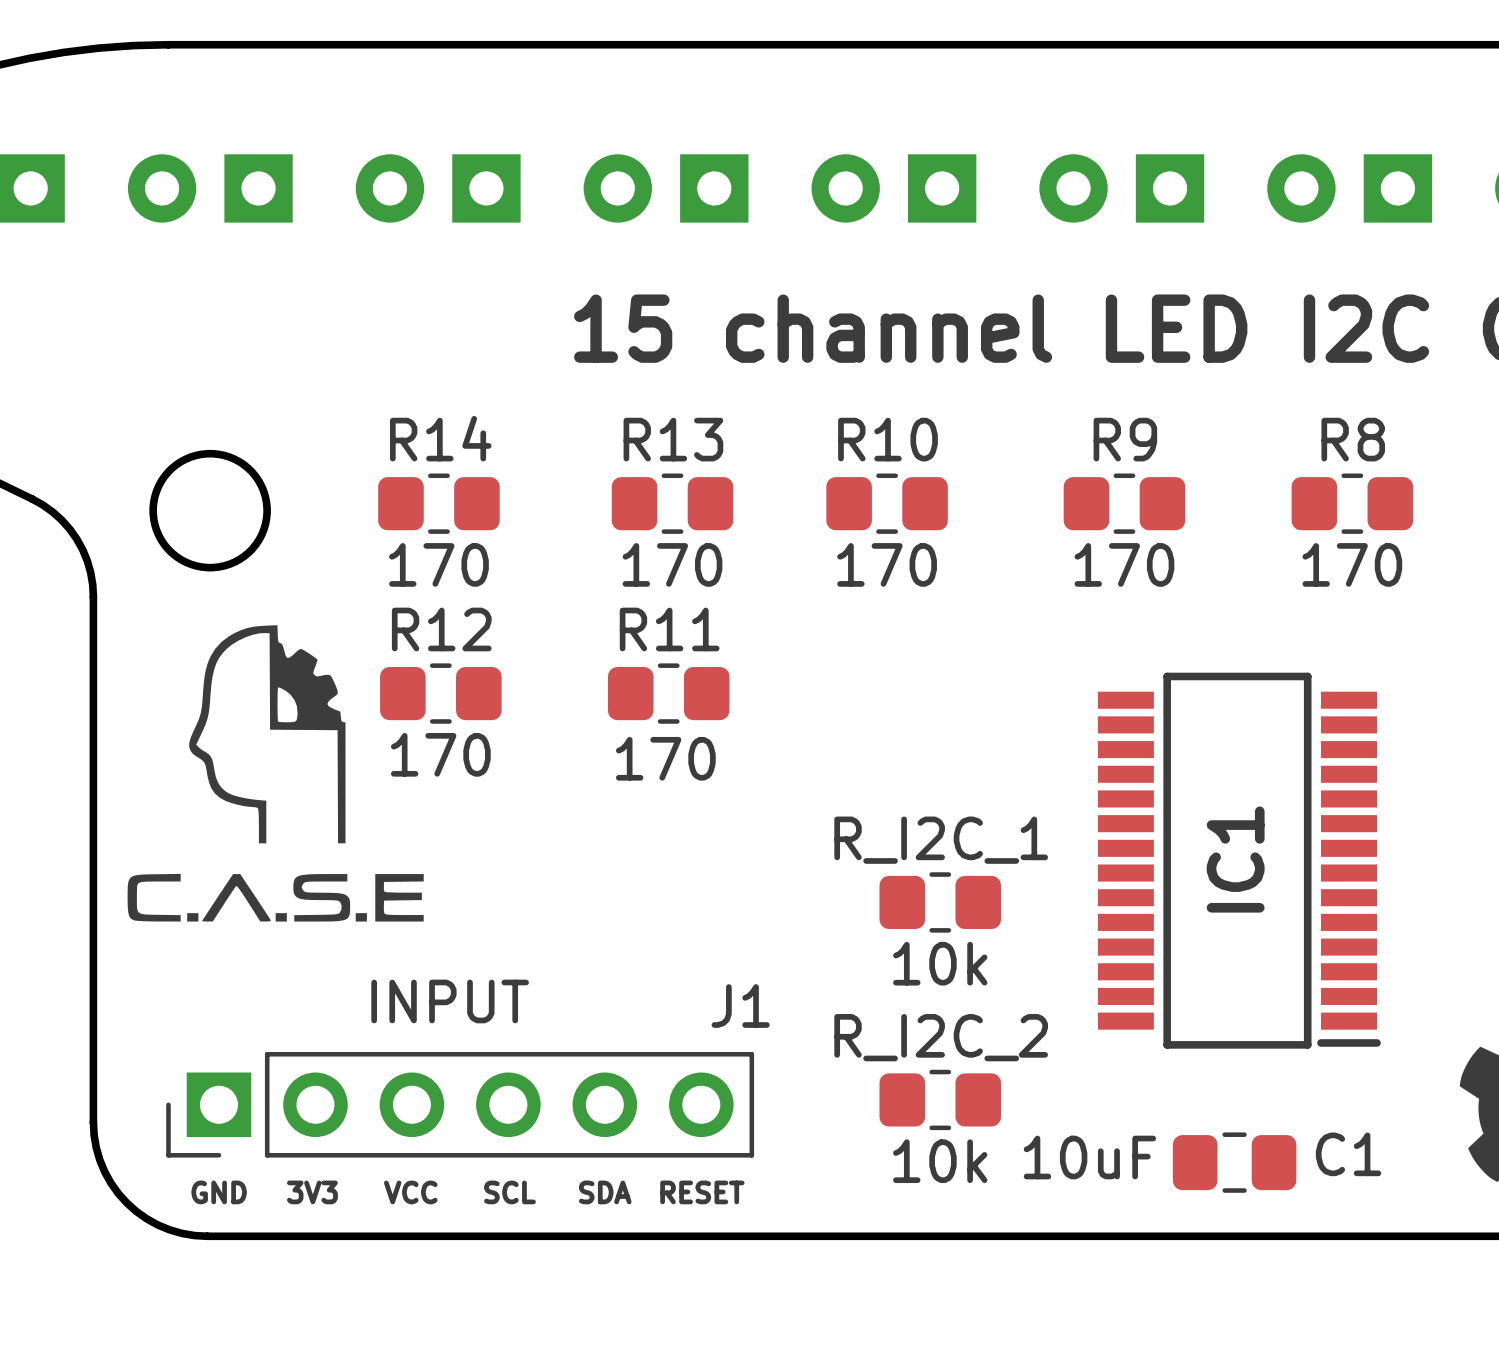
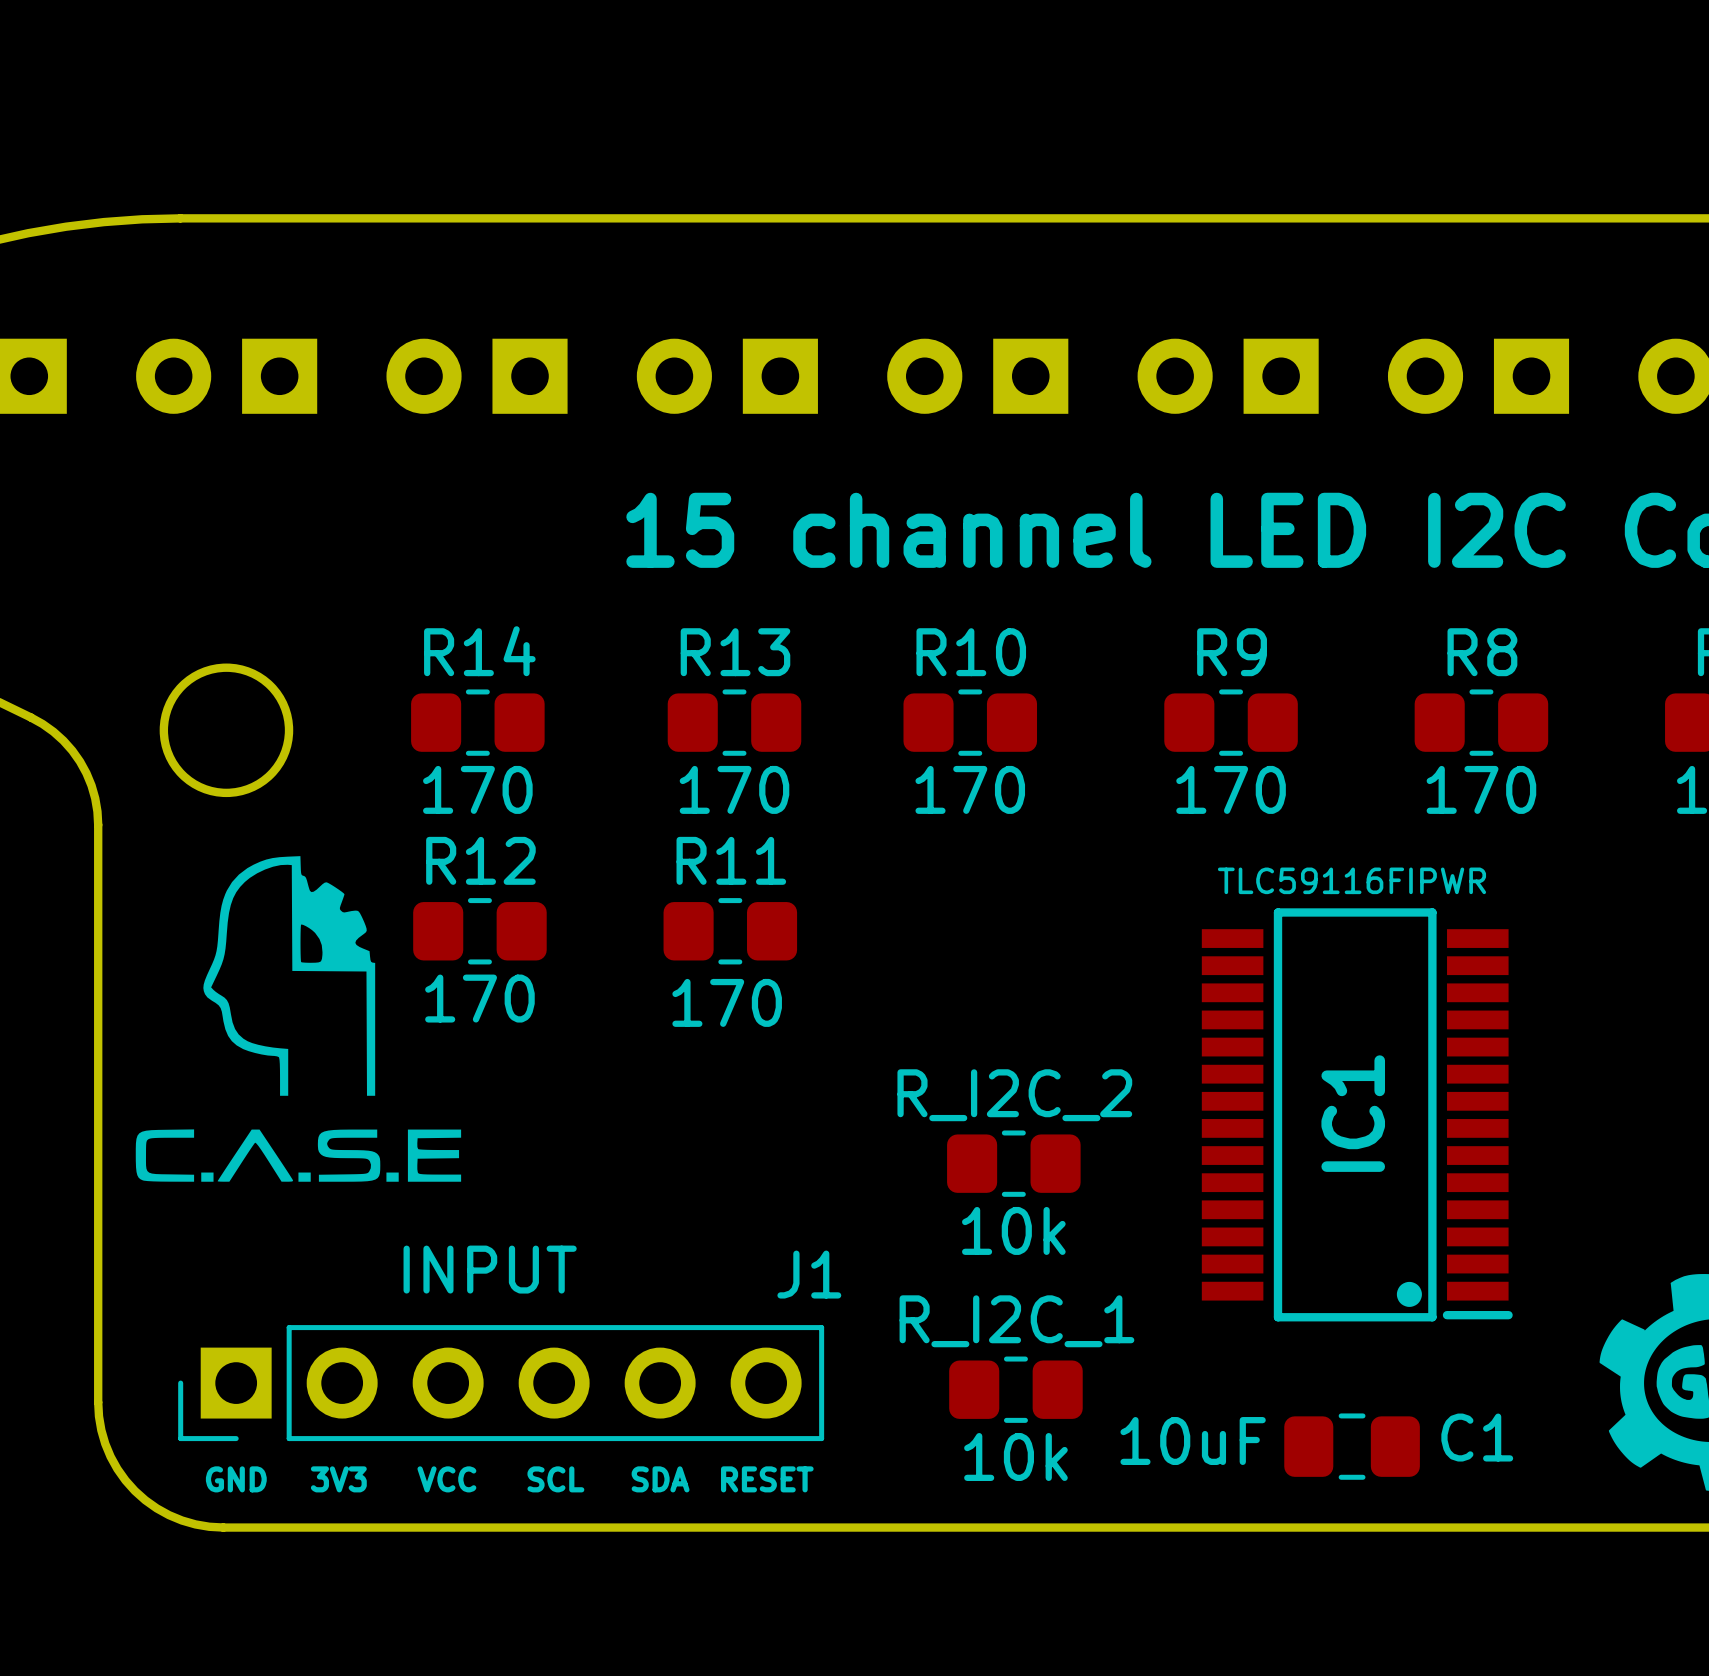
IC1 text: none -> TLC59116FIPWR (1351, 880)
R_I2C_1 position: (940, 902) -> (1015, 1389)
drawing: none -> [1396, 1281, 1422, 1307]
R_I2C_2 position: (940, 1099) -> (1013, 1163)

